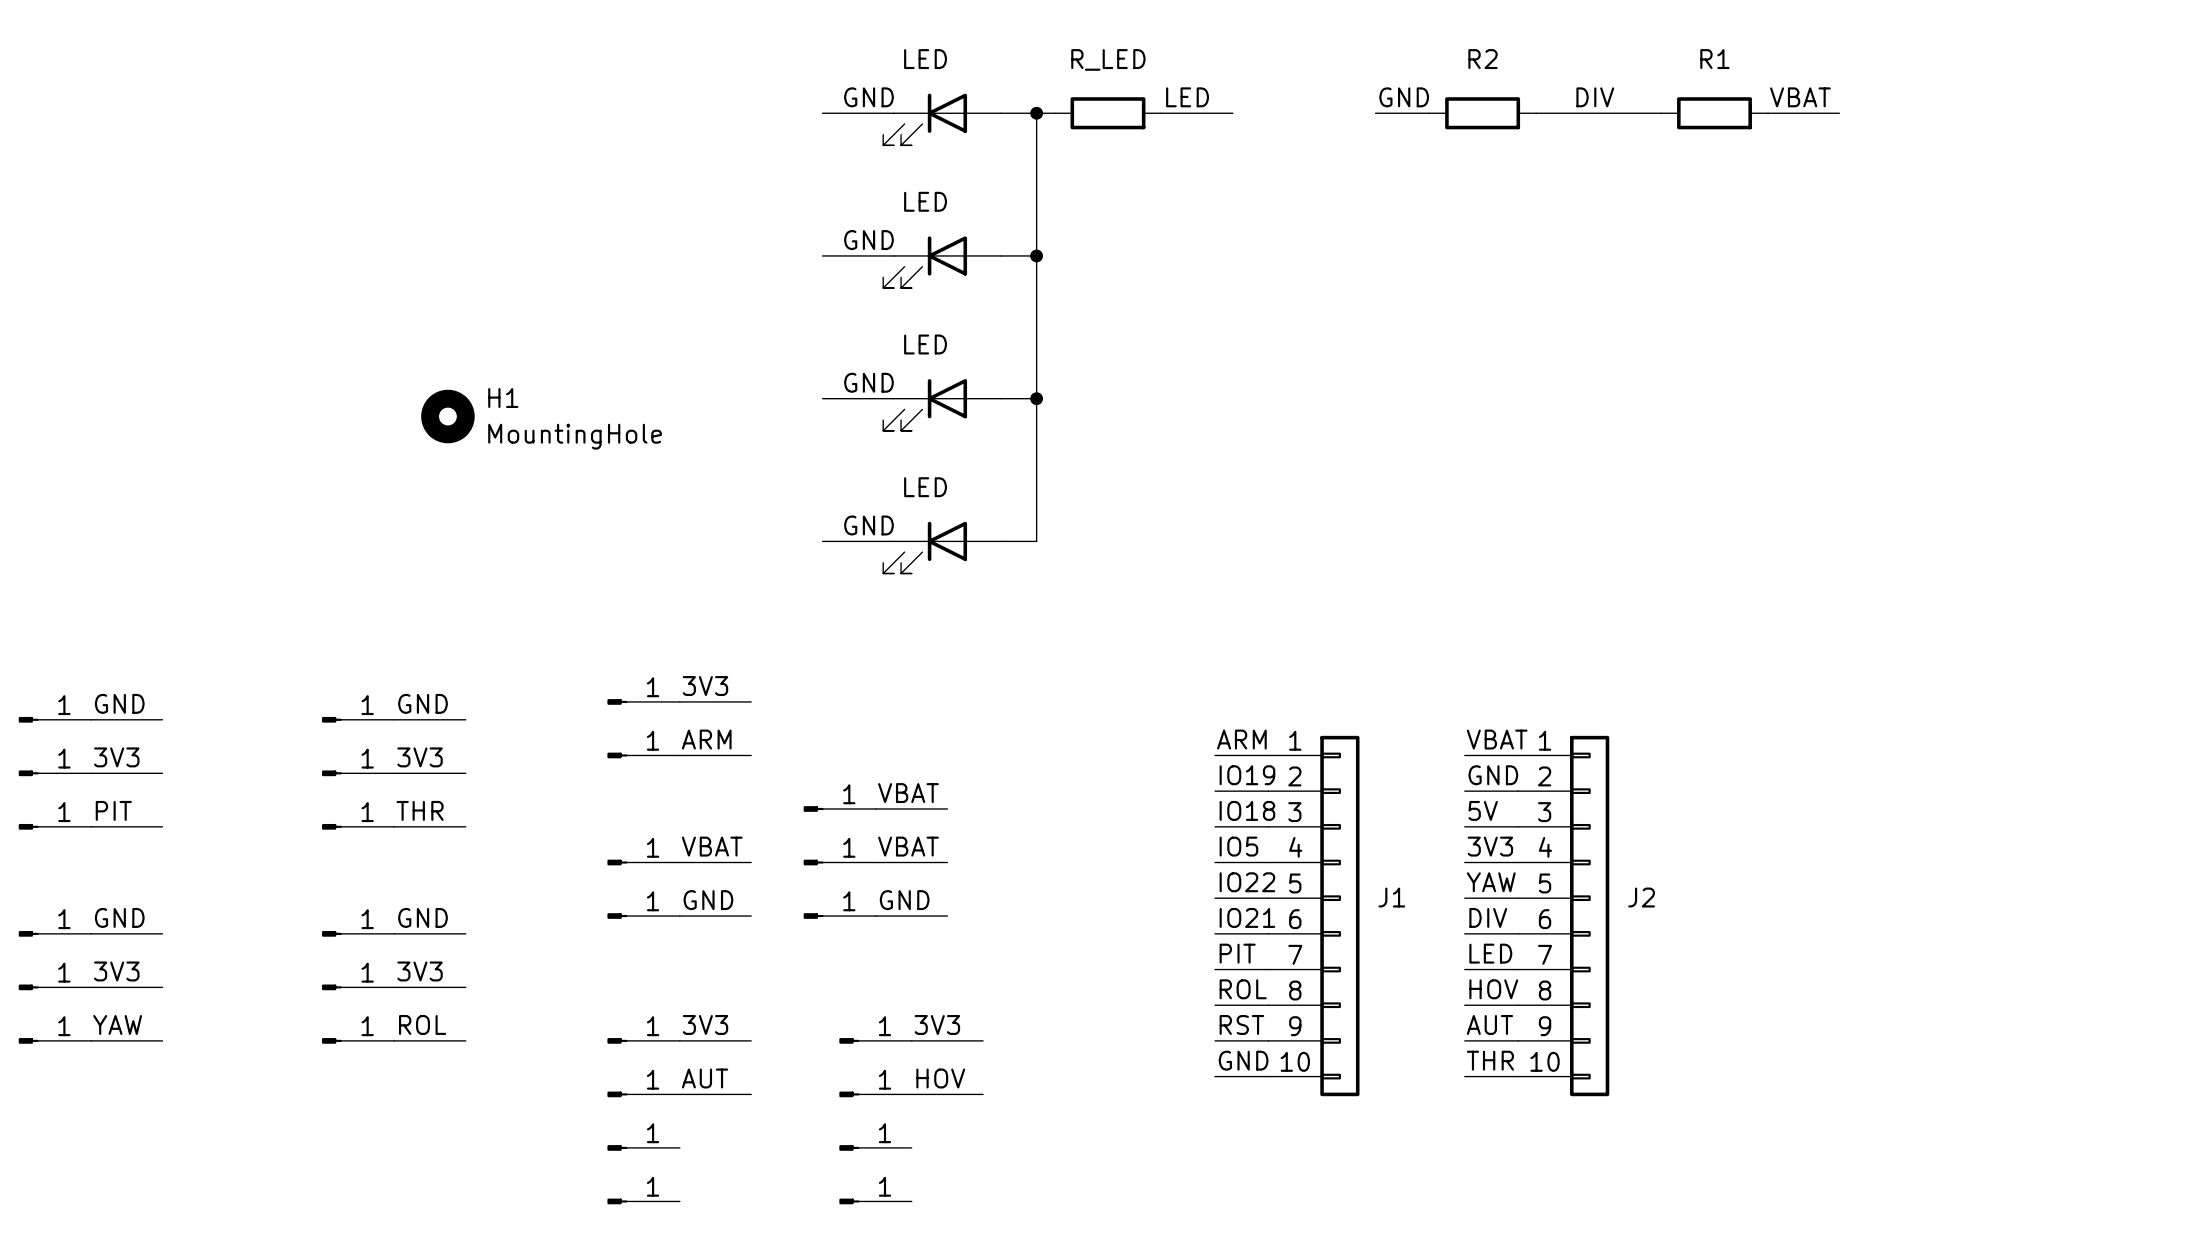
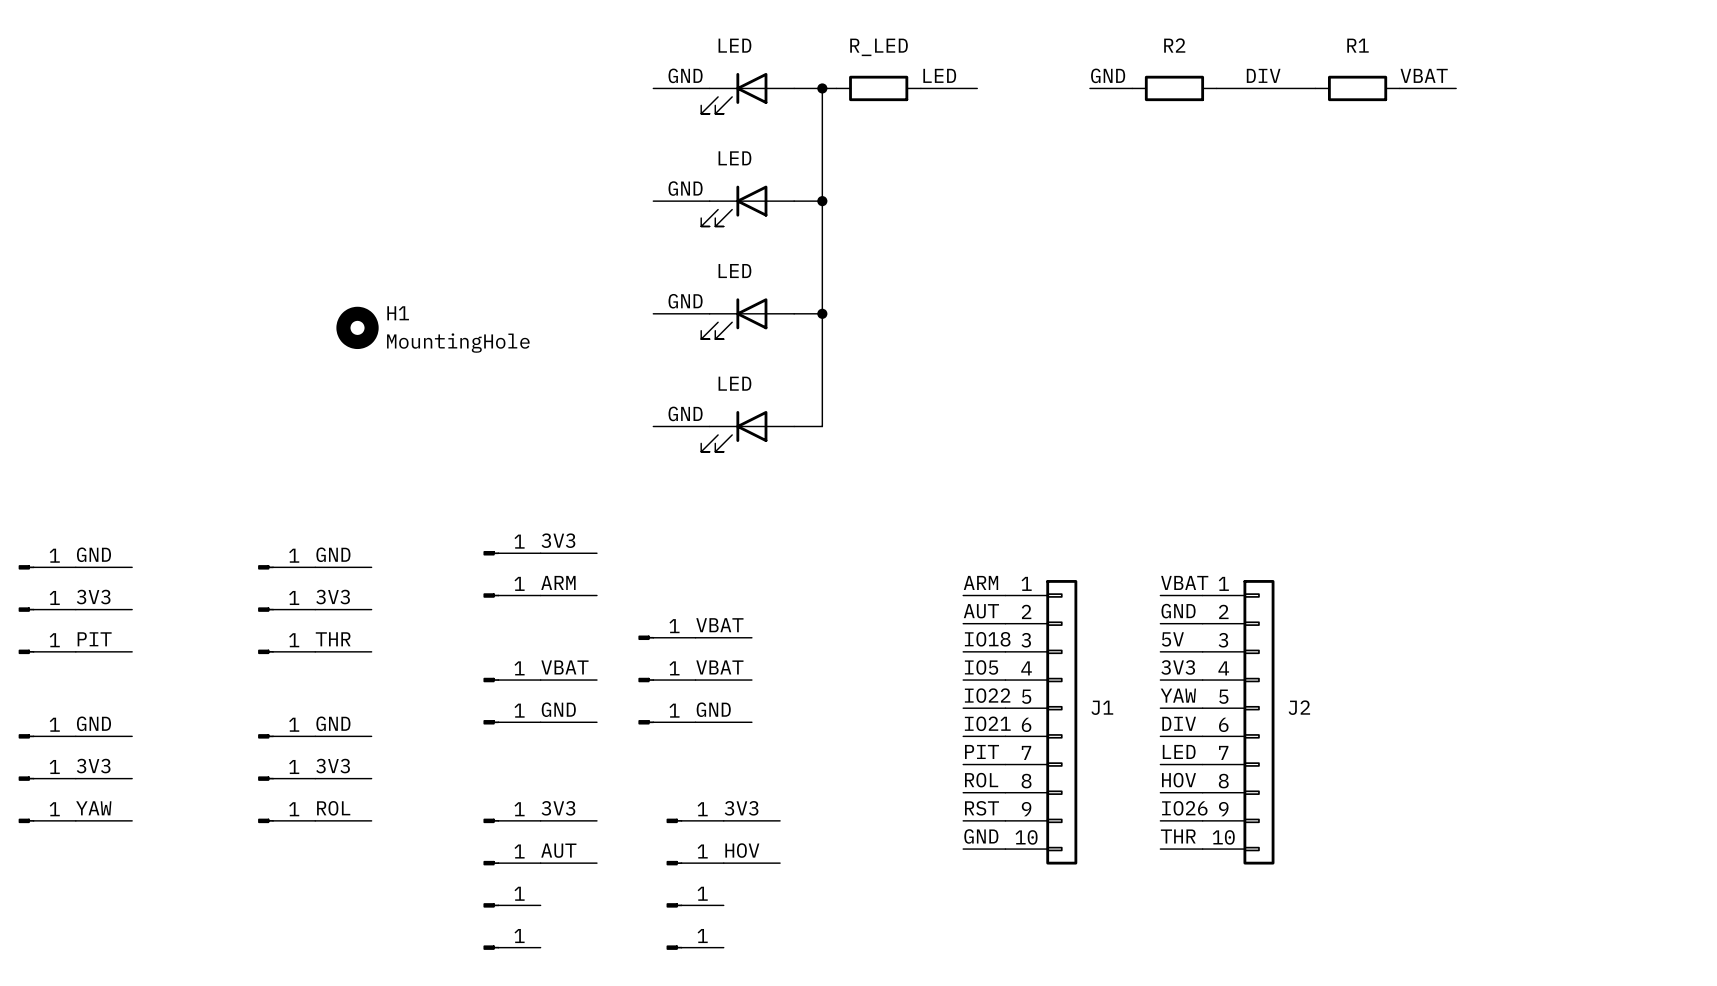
label: IO19 (1247, 775) -> AUT (981, 611)
label: AUT (1489, 1024) -> IO26 (1184, 808)

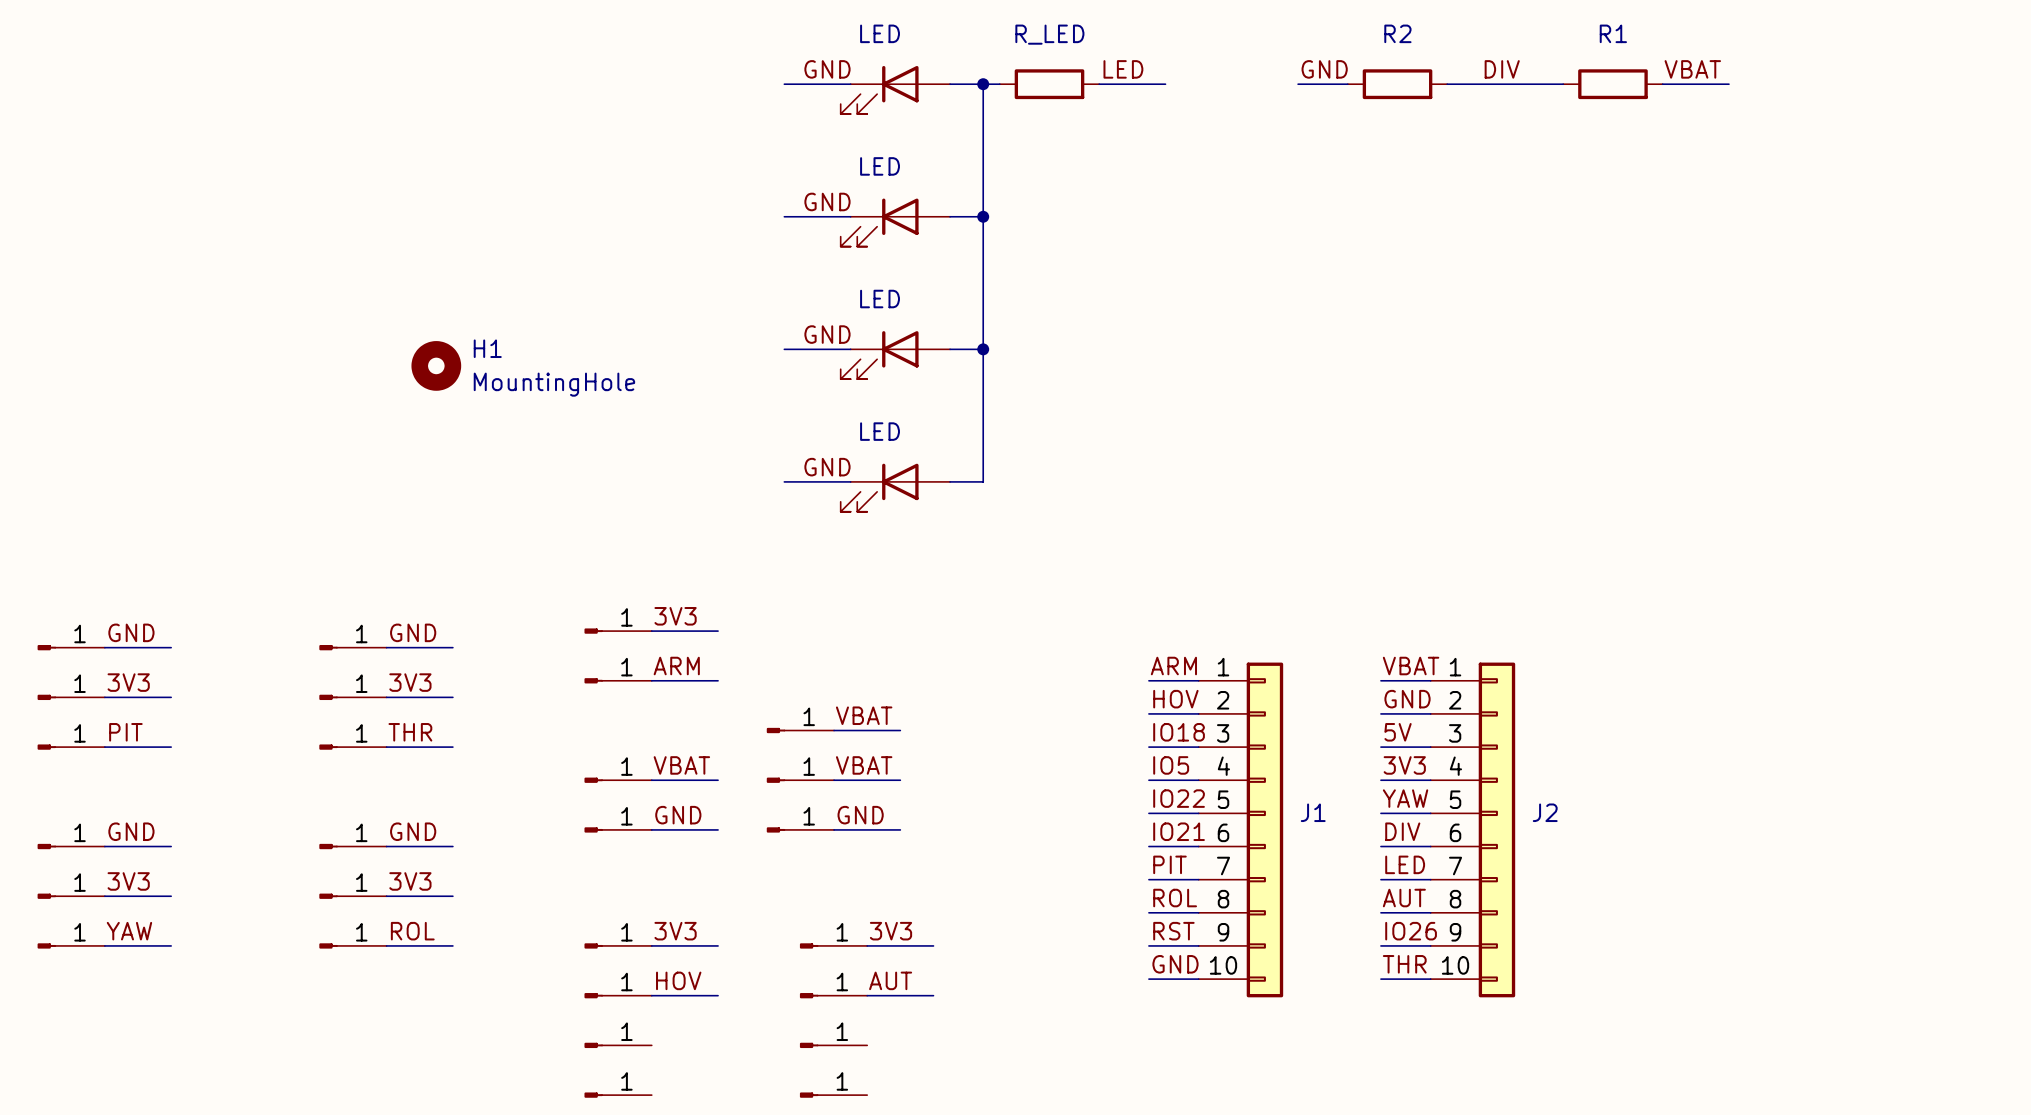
label: AUT (981, 611) -> HOV (1175, 699)
label: HOV (1178, 780) -> AUT (1404, 898)
label: AUT (558, 850) -> HOV (678, 980)
label: HOV (742, 850) -> AUT (890, 980)

